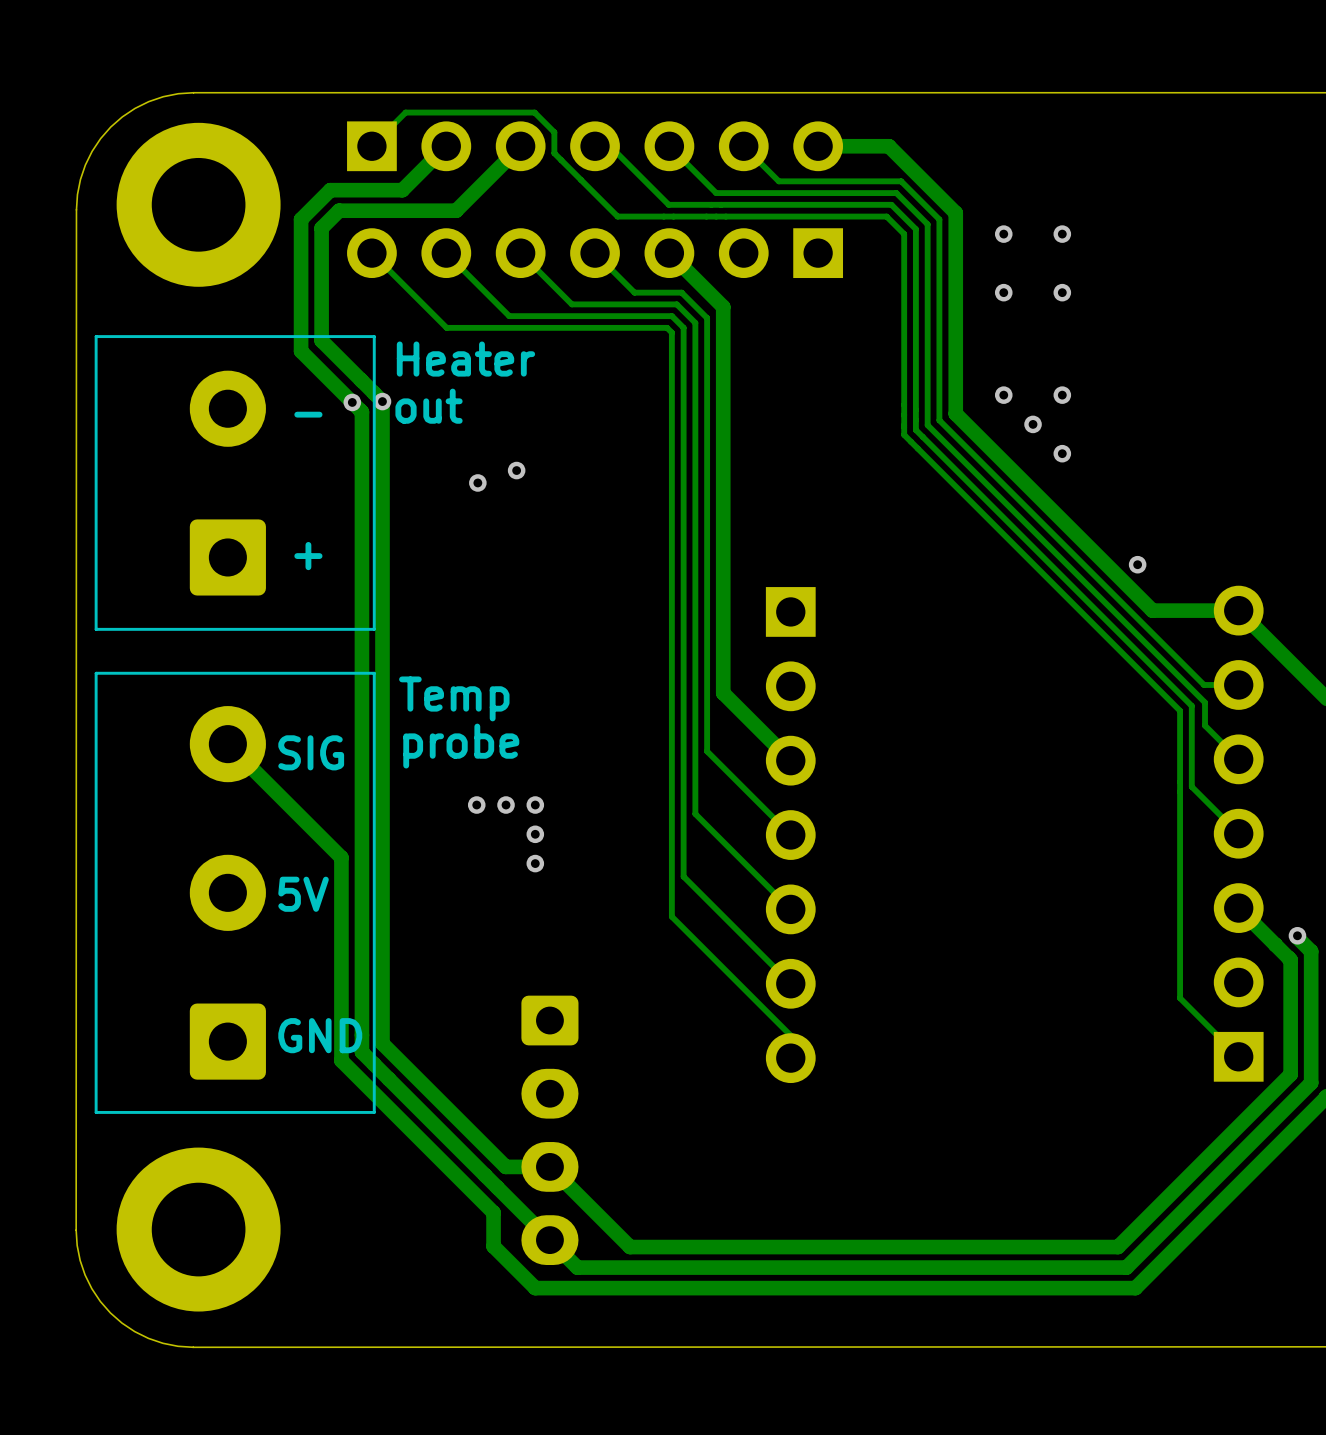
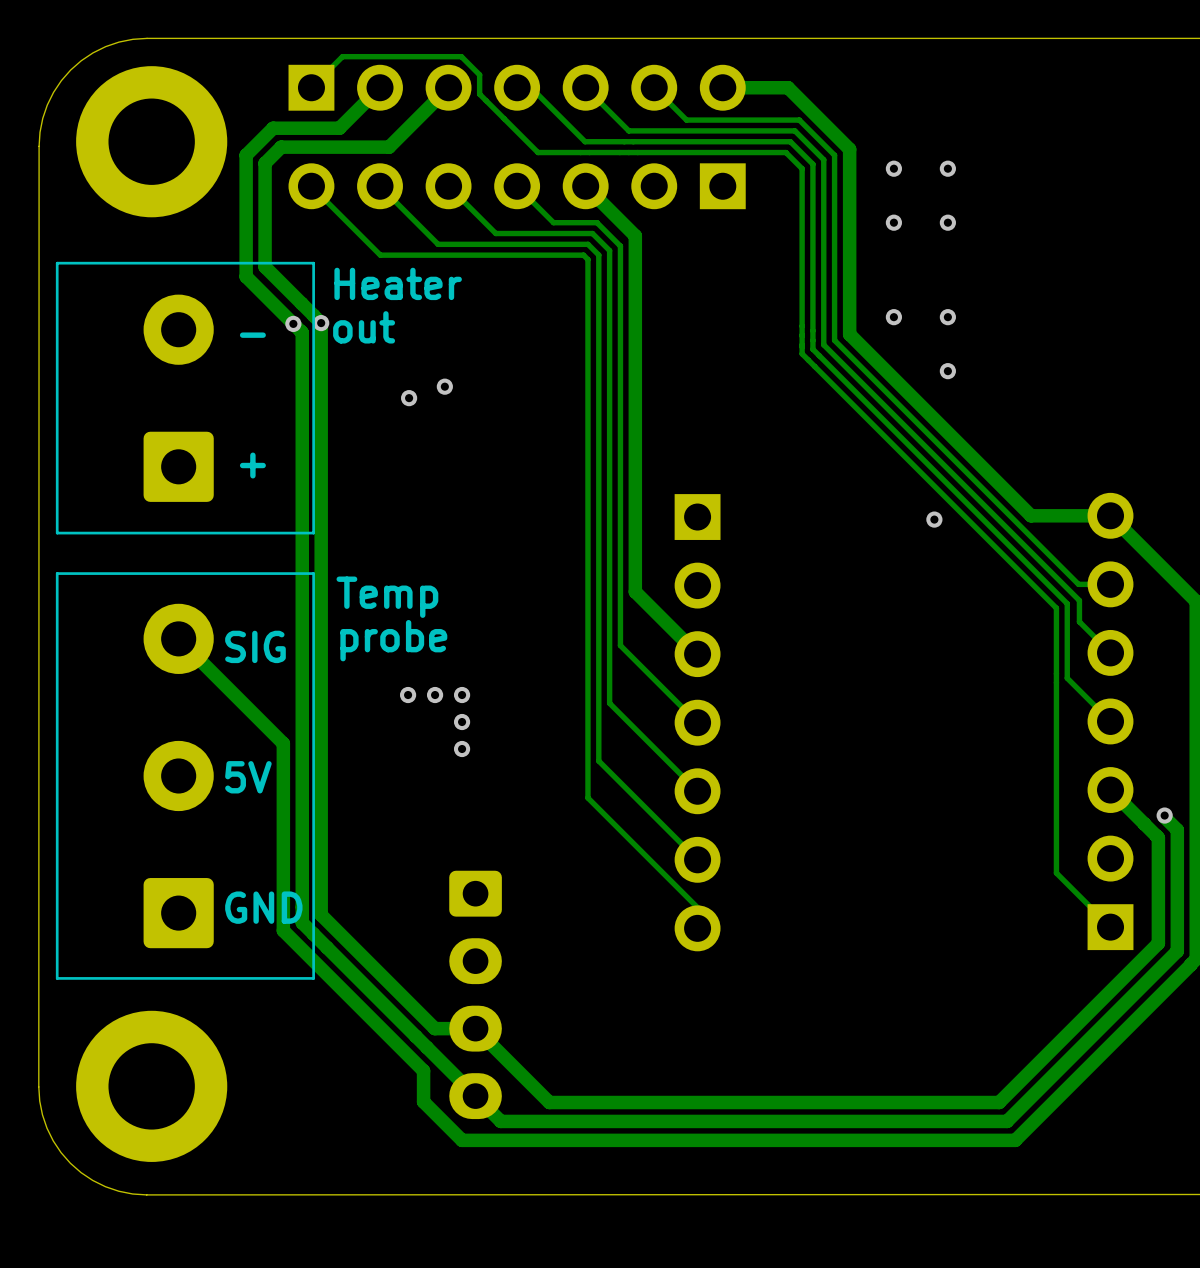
via: (1033, 424) -> none
via: (1137, 564) -> none
via: none -> (934, 519)

